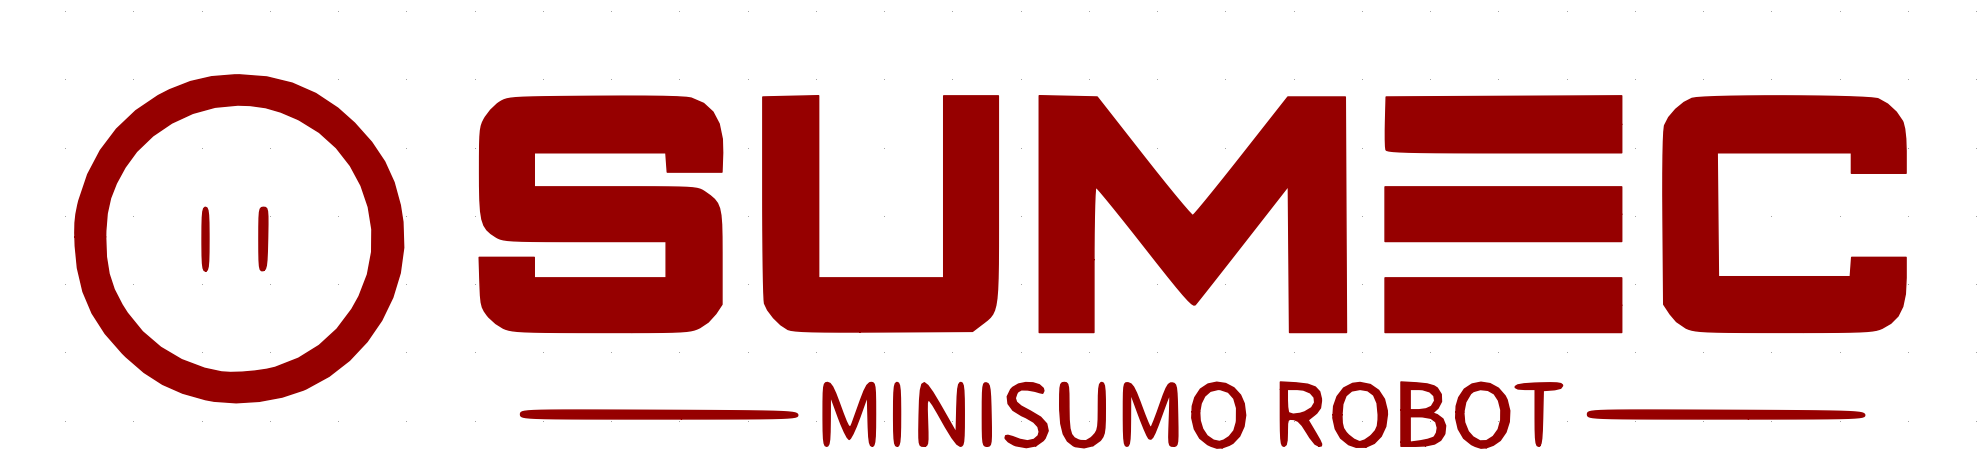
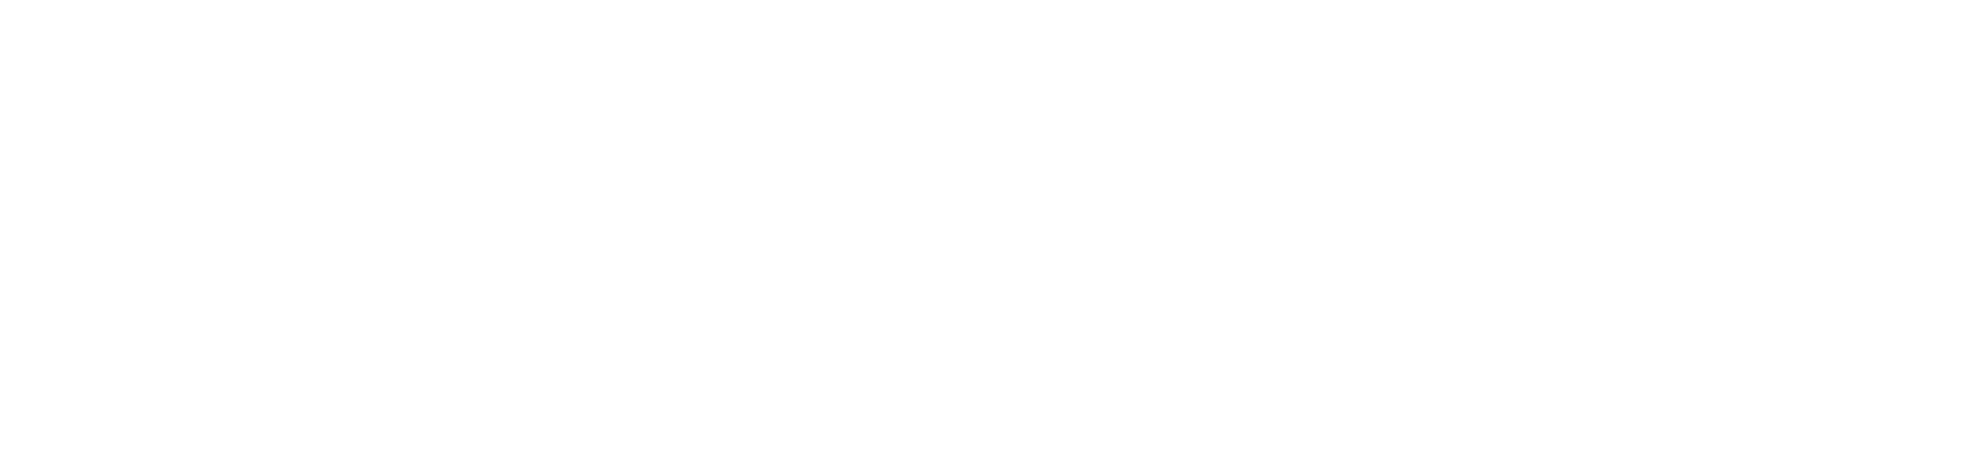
power symbol: (990, 261) -> none

